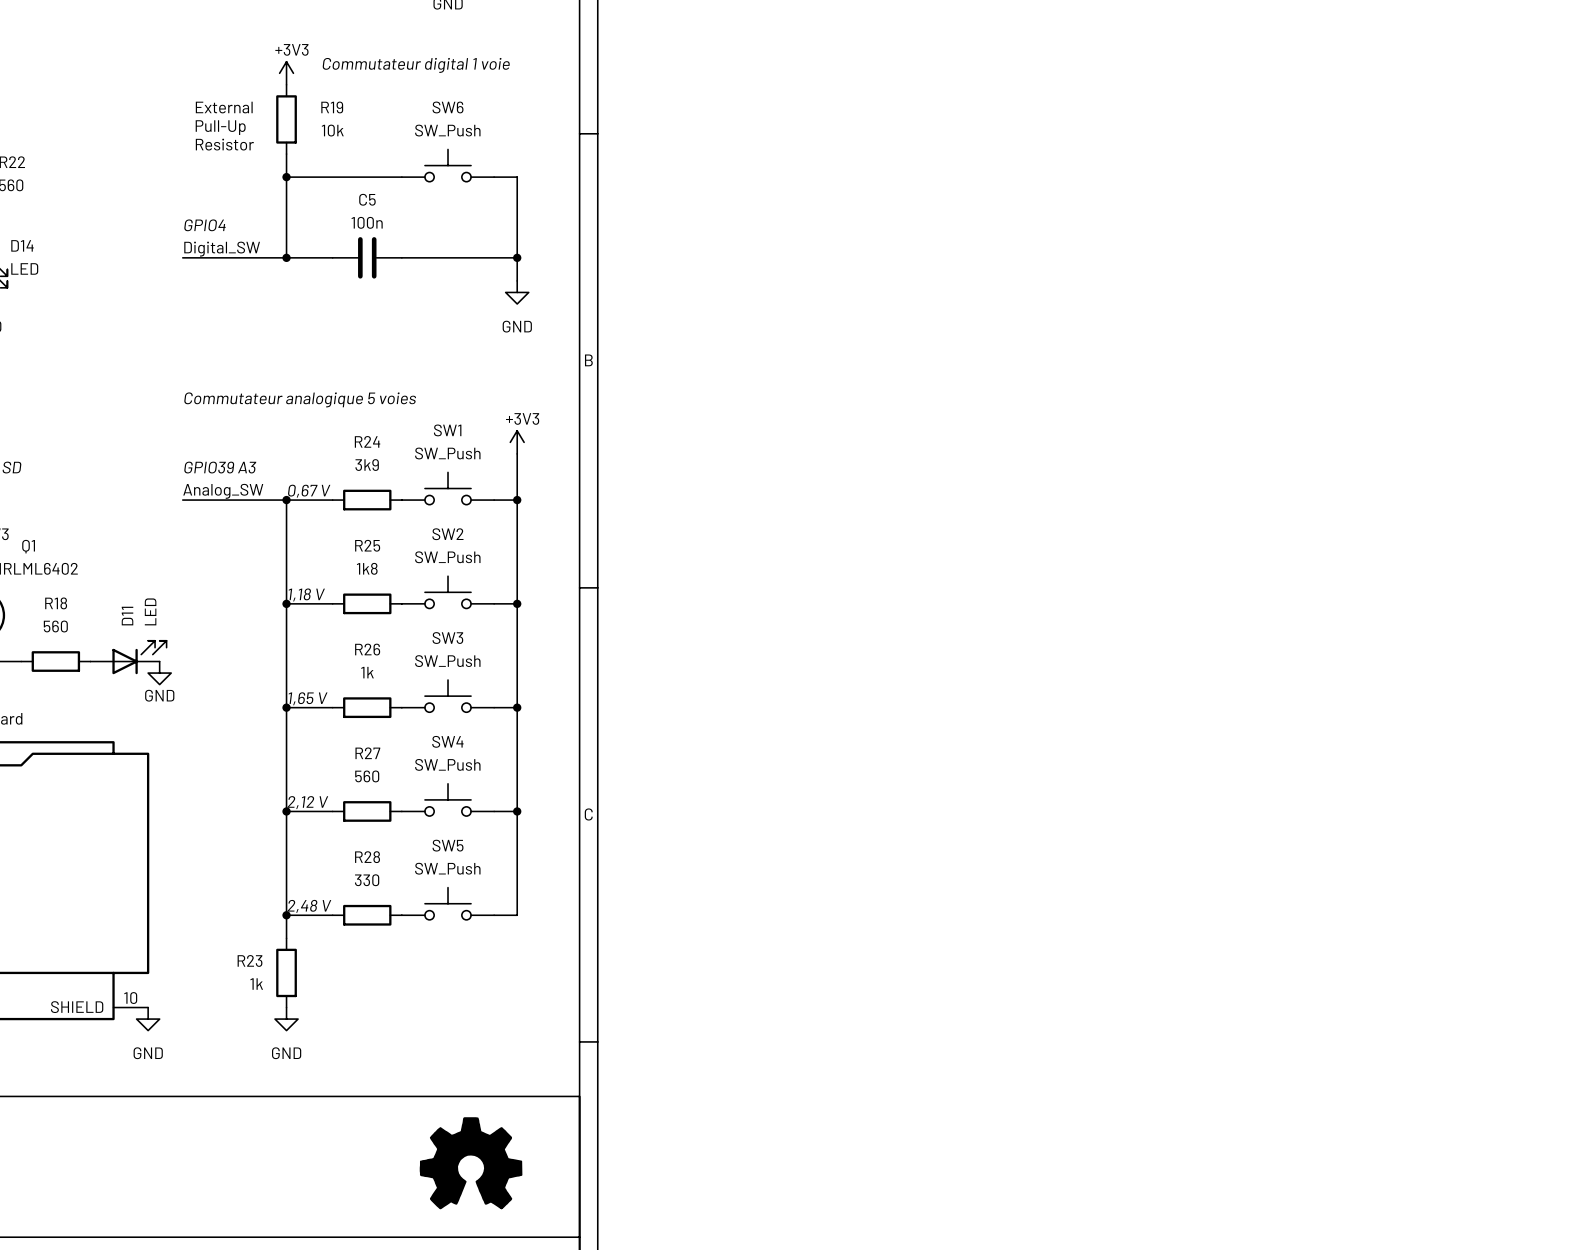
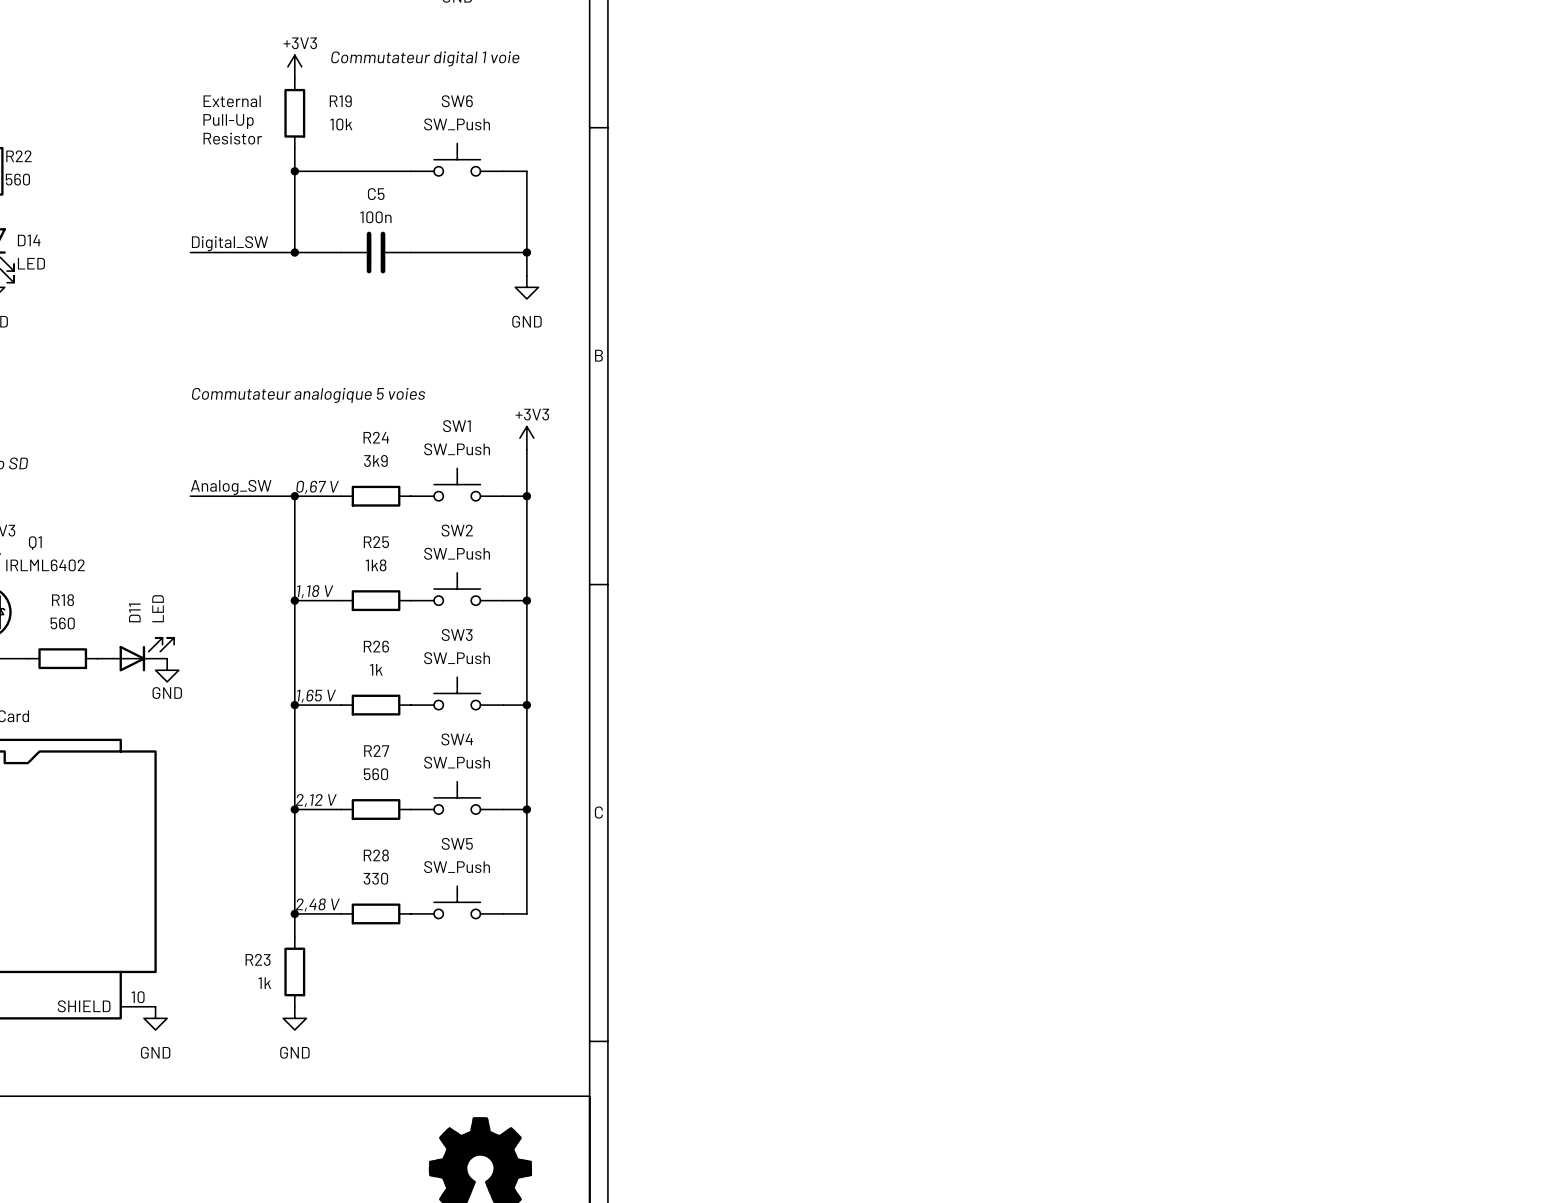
text: GPIO4 (204, 225) -> none
text: GPIO39 A3 (220, 467) -> none

